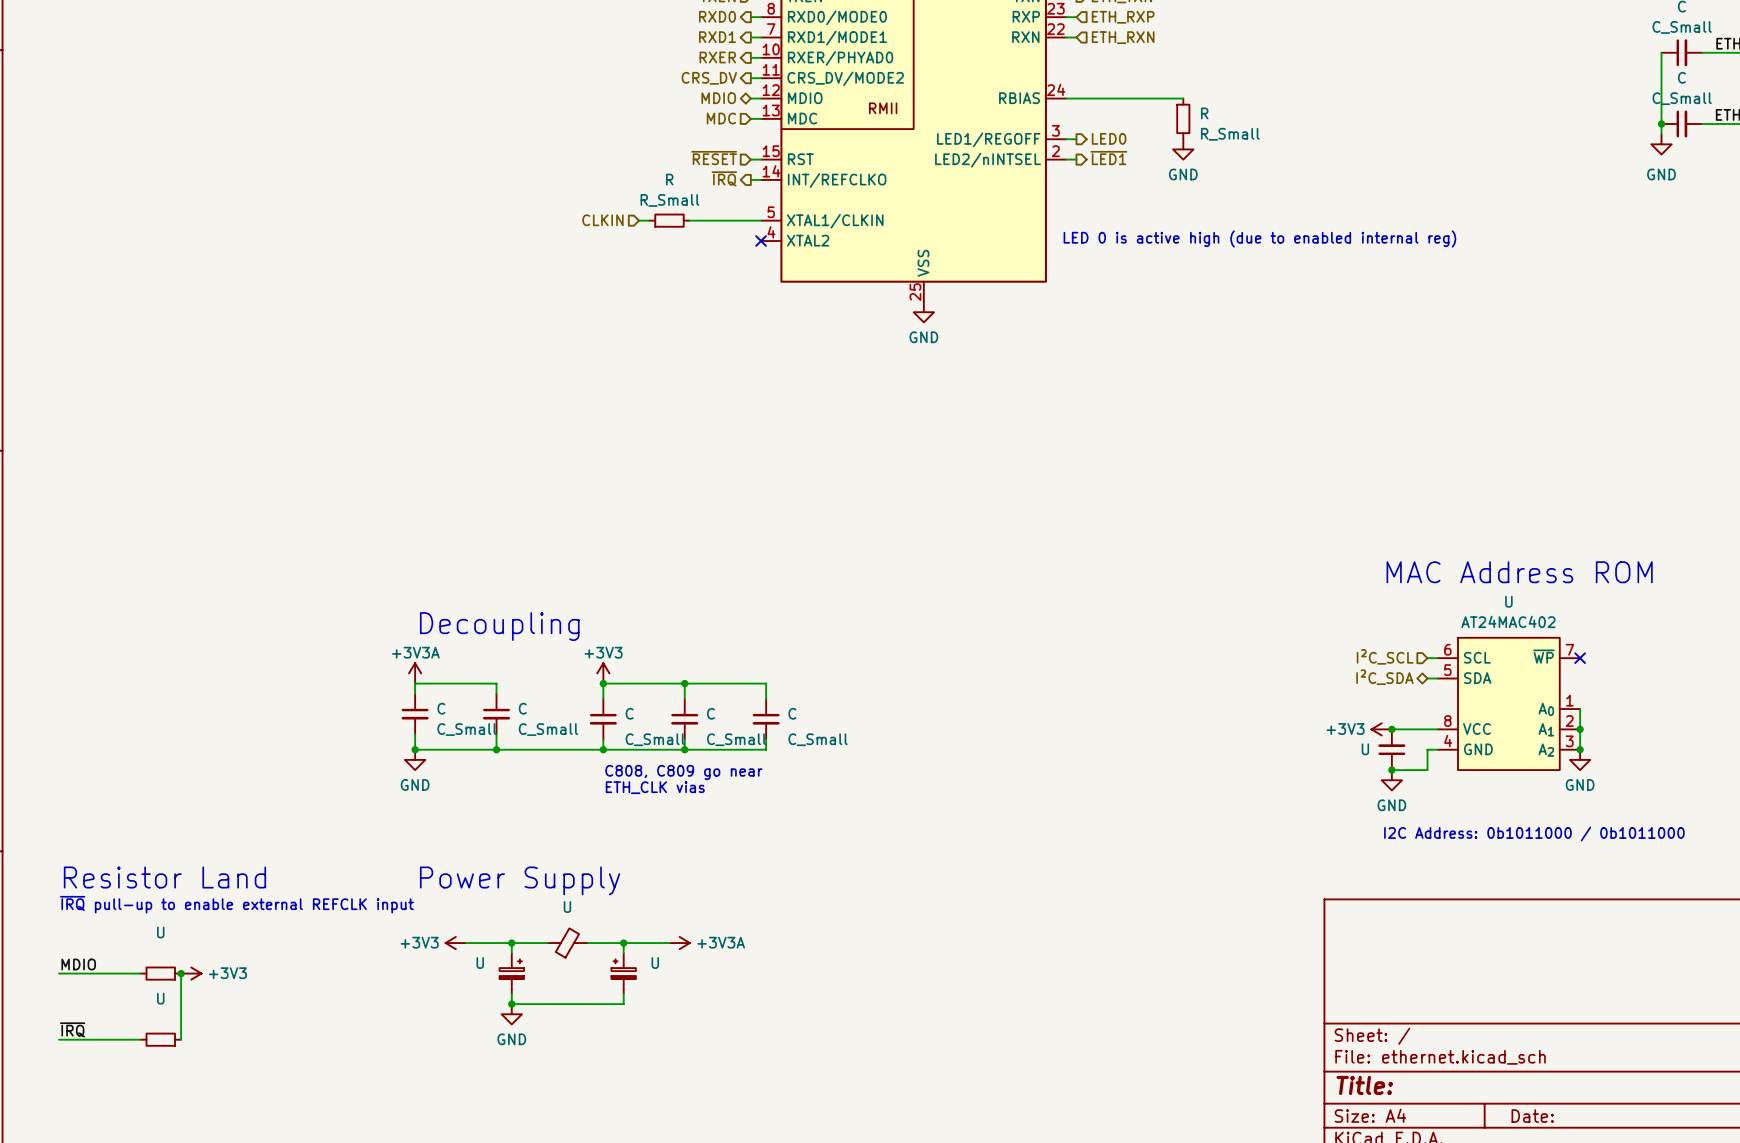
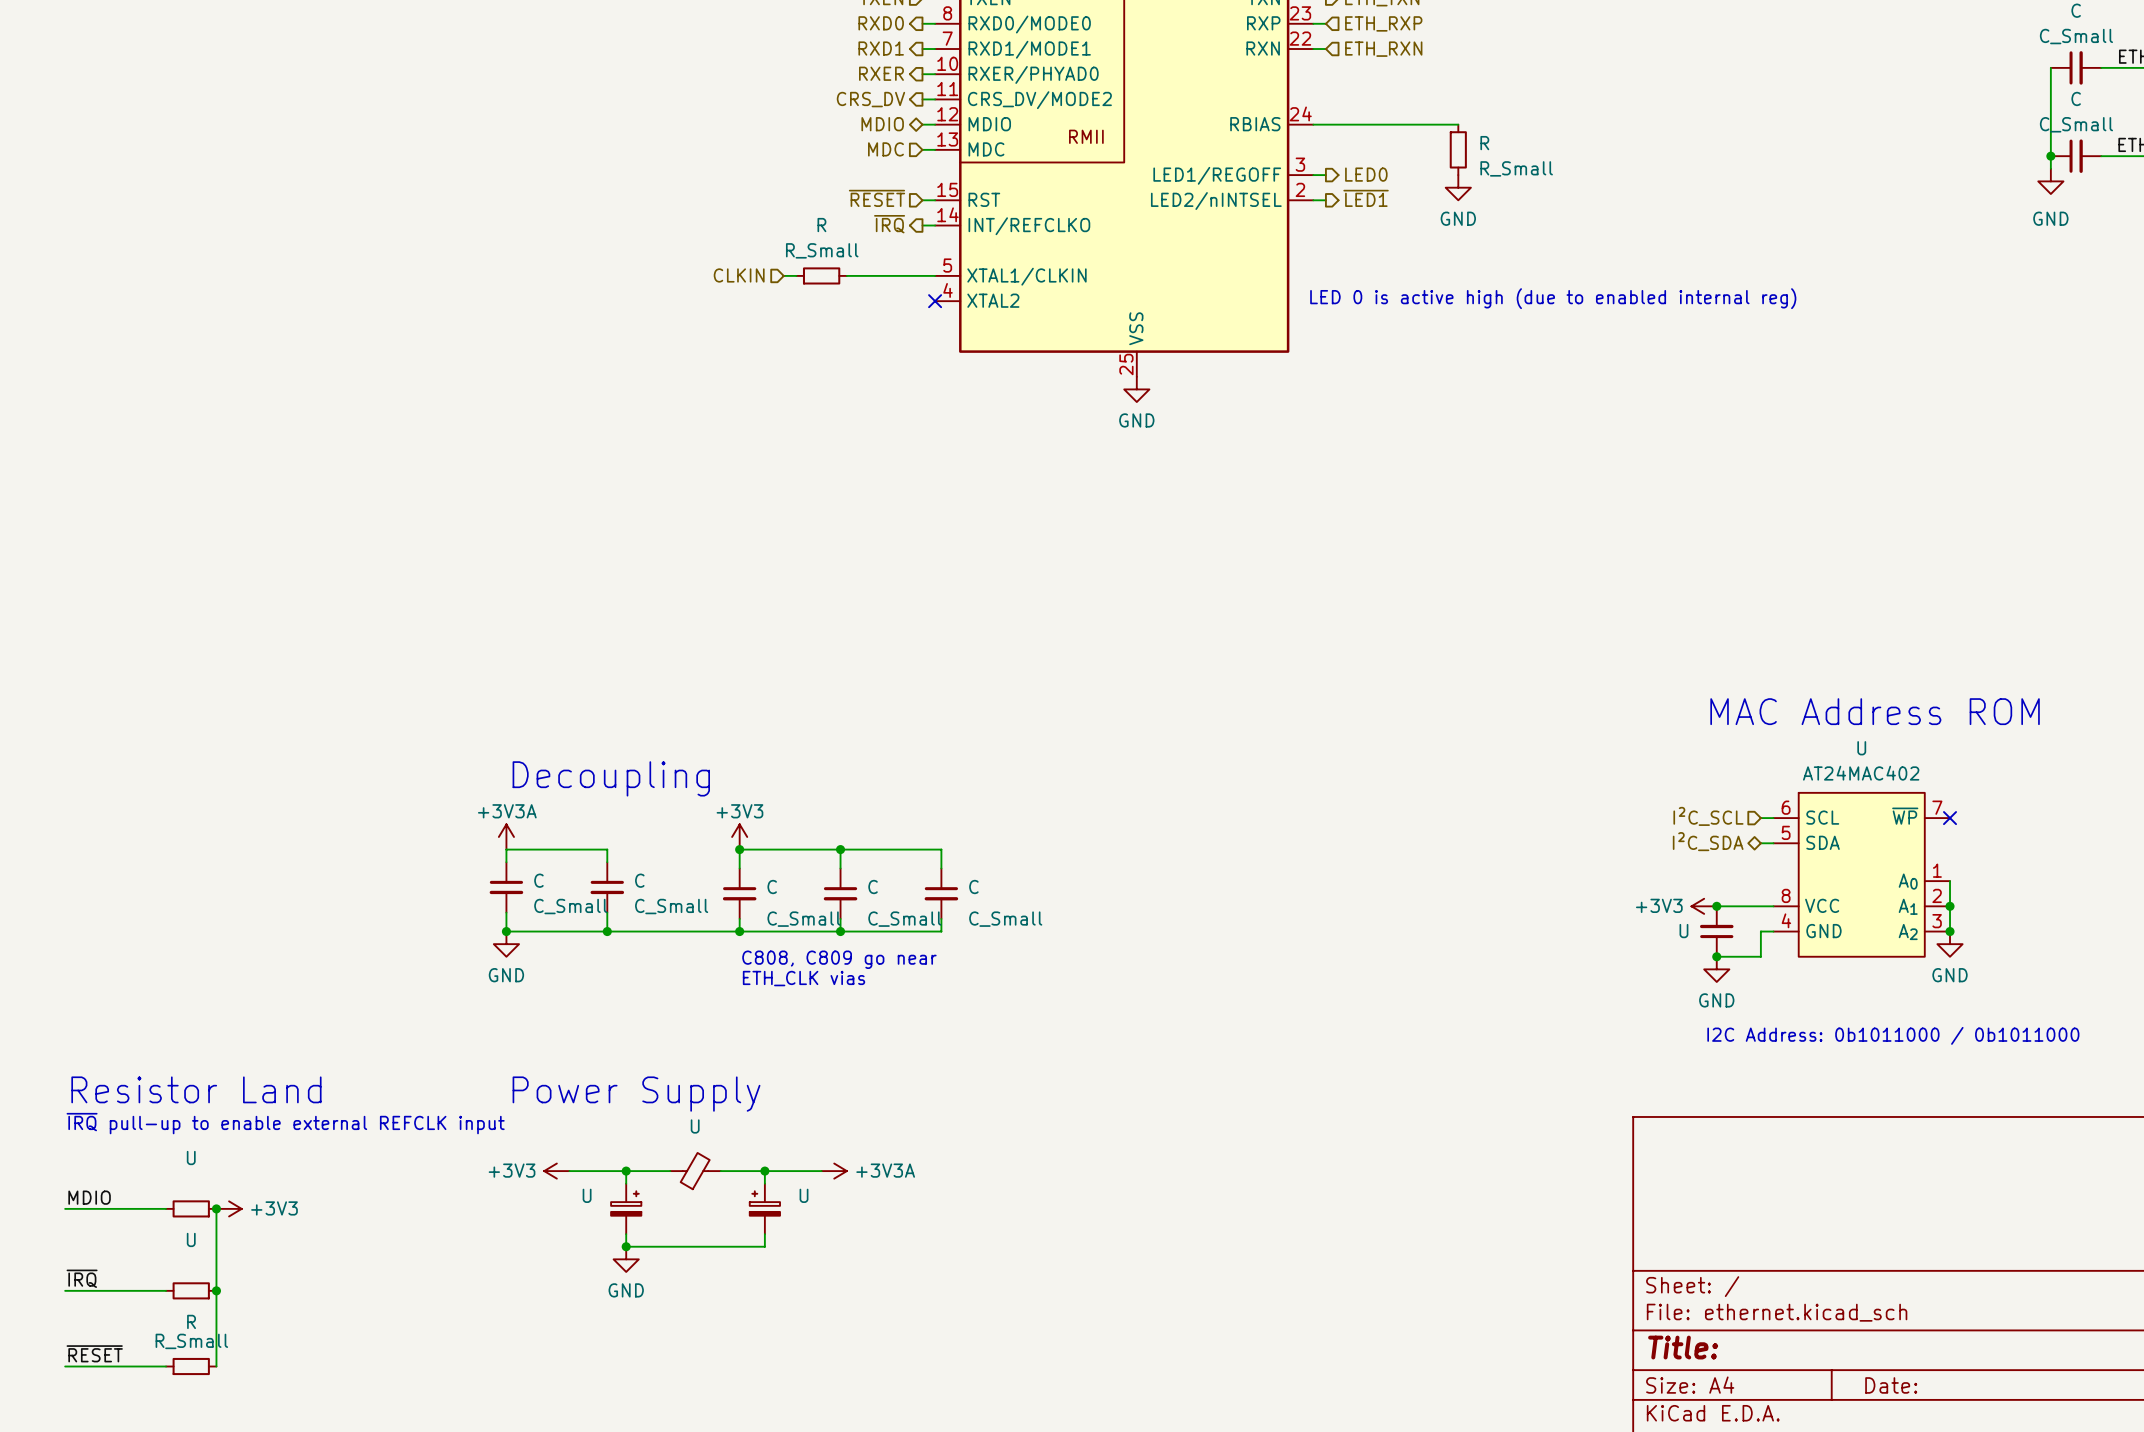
wire: none -> (216, 1290) (216, 1366)
junction: none -> (216, 1290)
label: none -> ~{RESET} (94, 1353)
wire: none -> (65, 1366) (166, 1366)
R: none -> R_Small (191, 1366)

